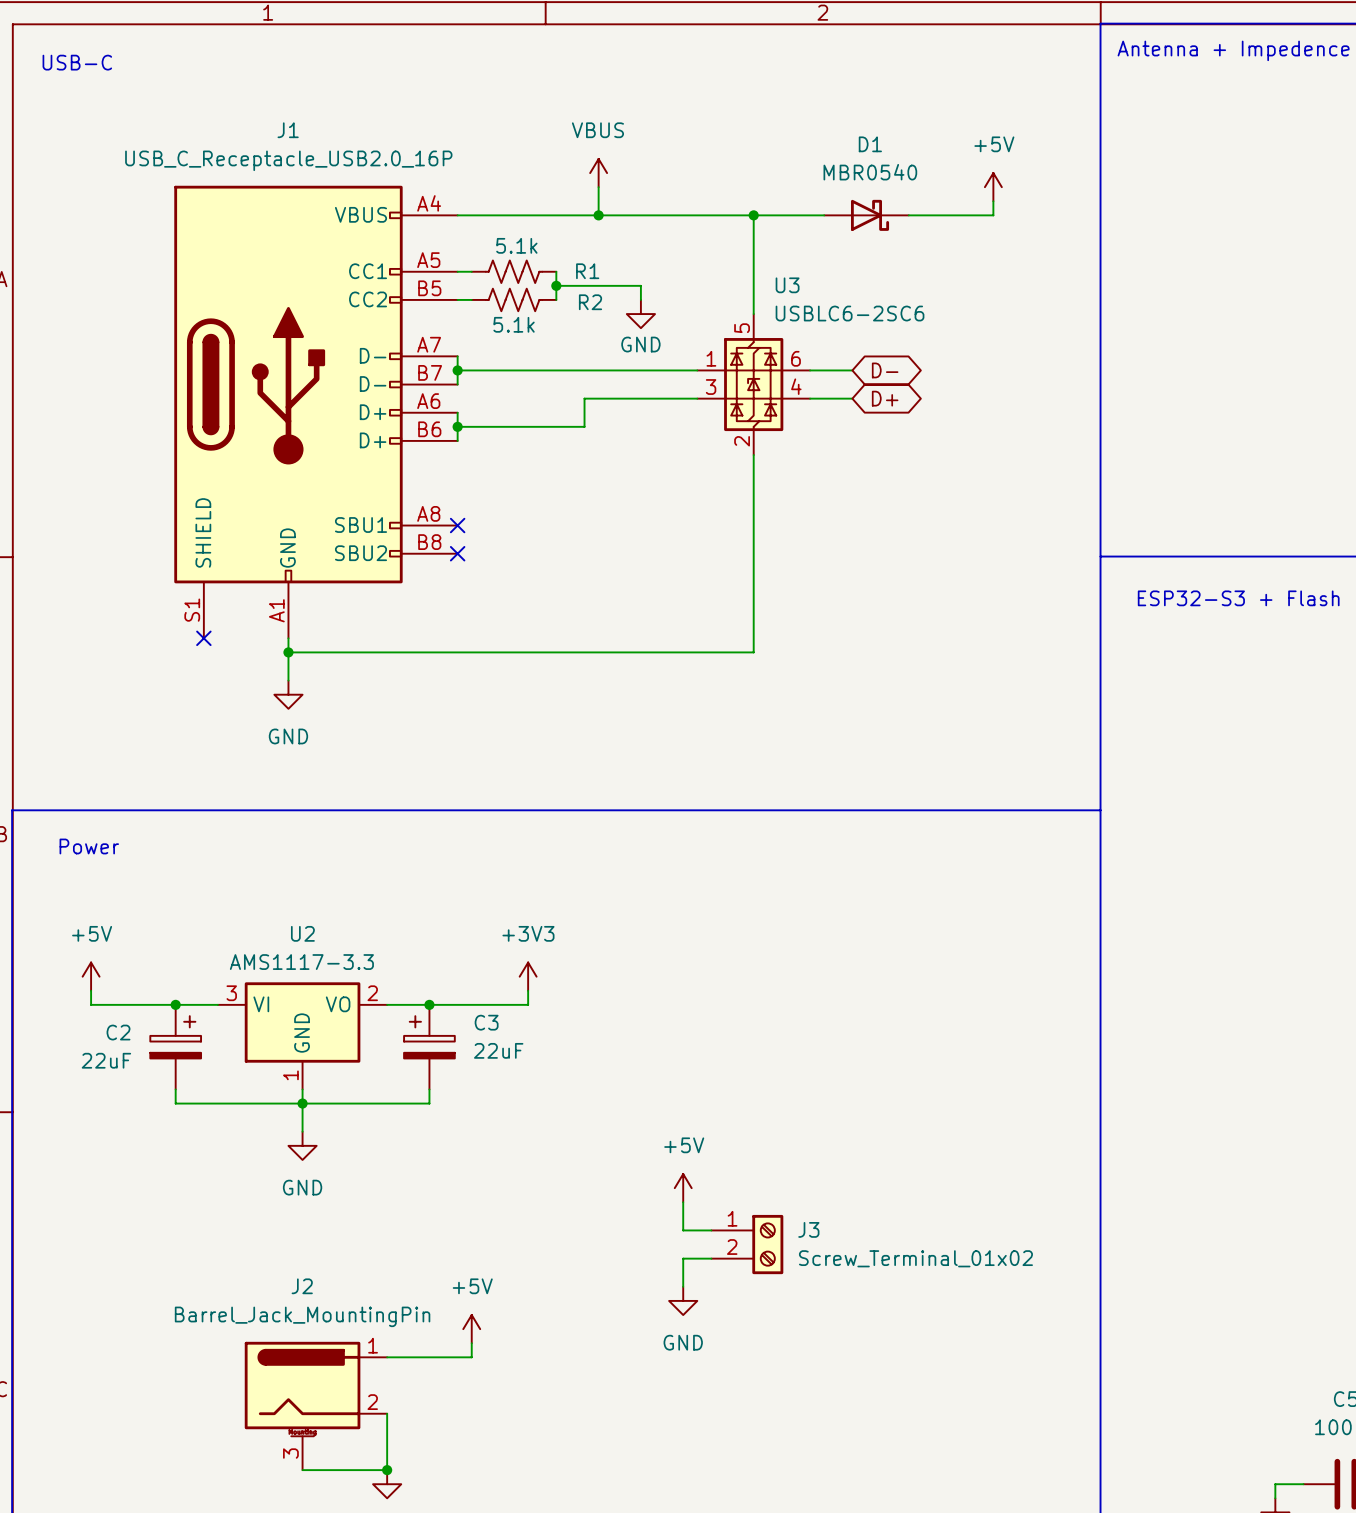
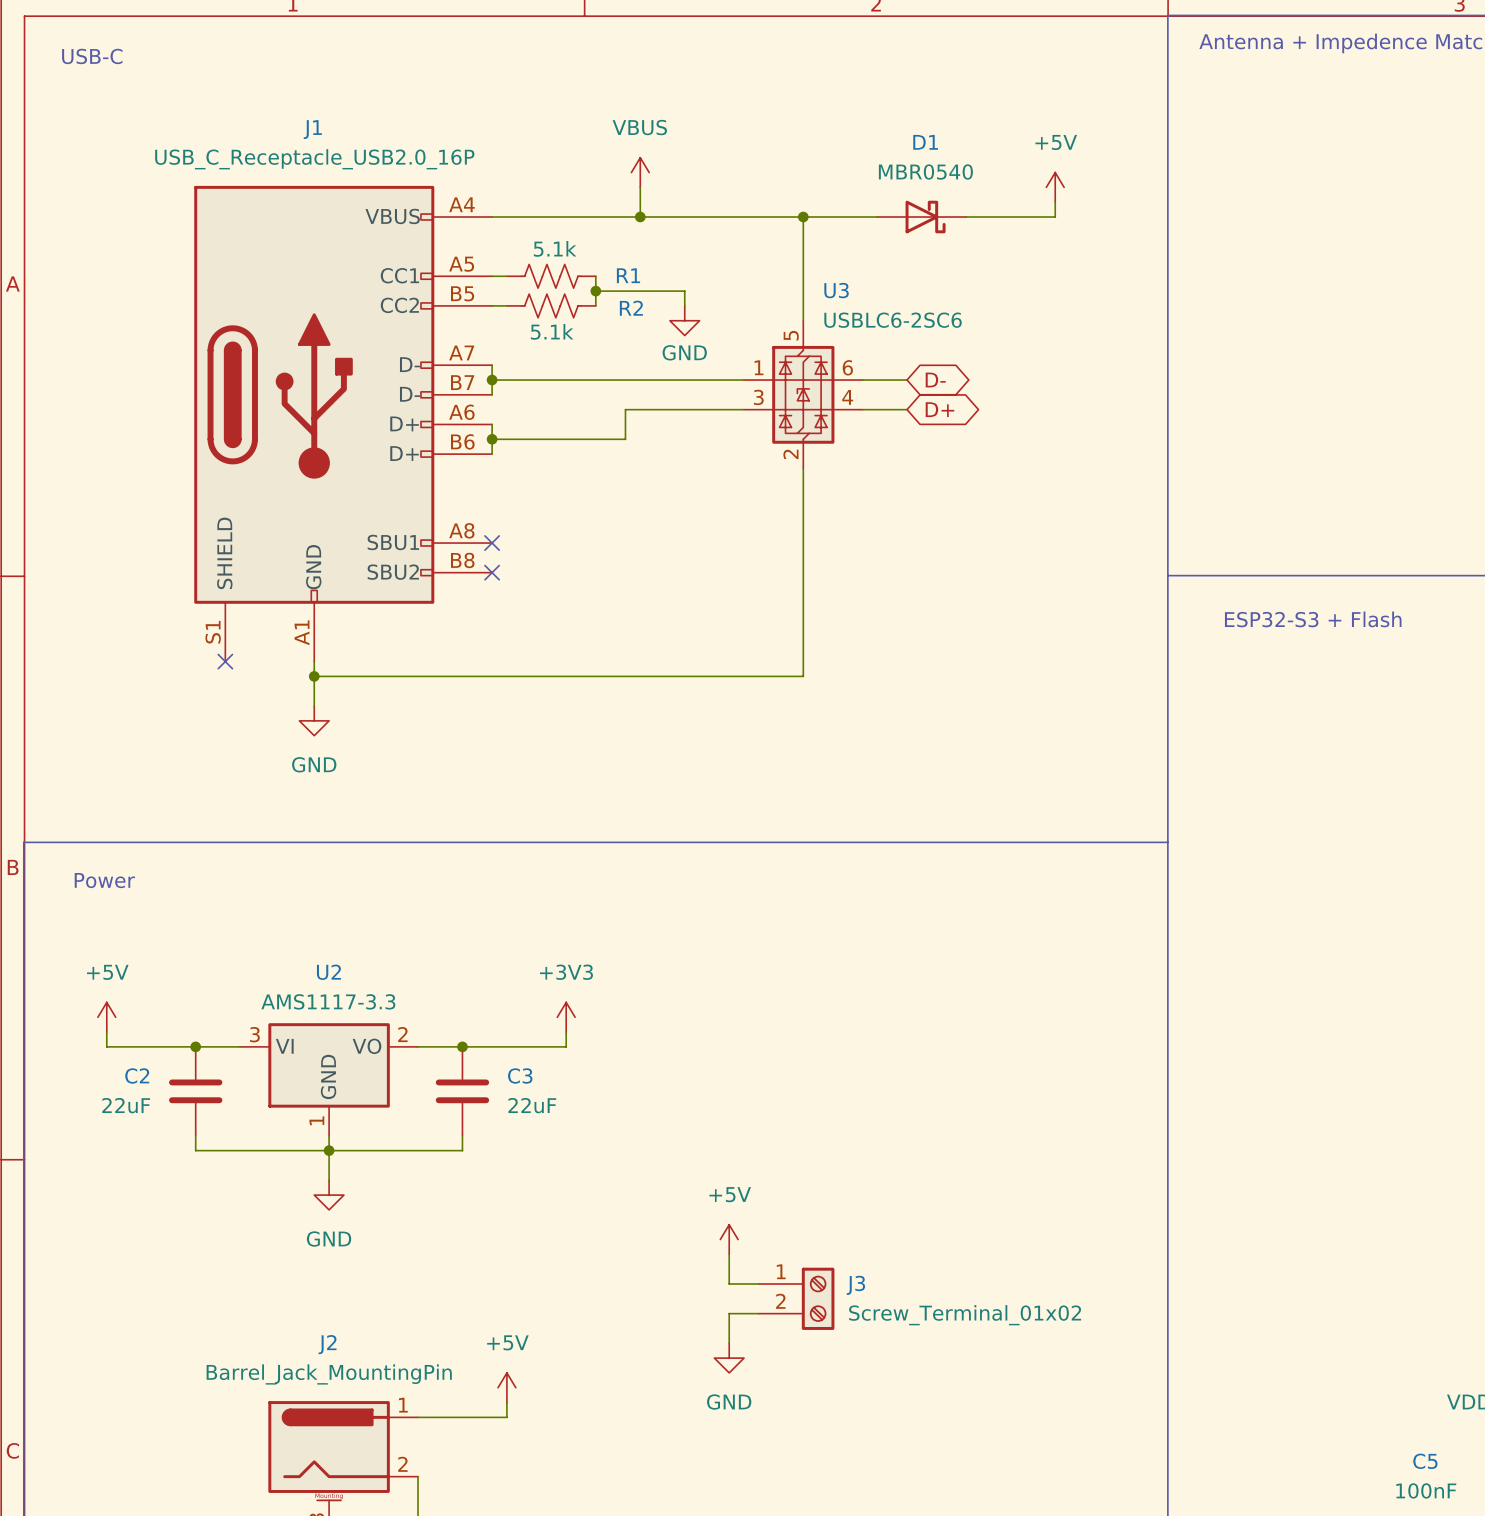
C2 symbol: [150, 1004, 202, 1090] -> [169, 1046, 223, 1136]
C3 symbol: [404, 1004, 455, 1090] -> [435, 1046, 490, 1136]

